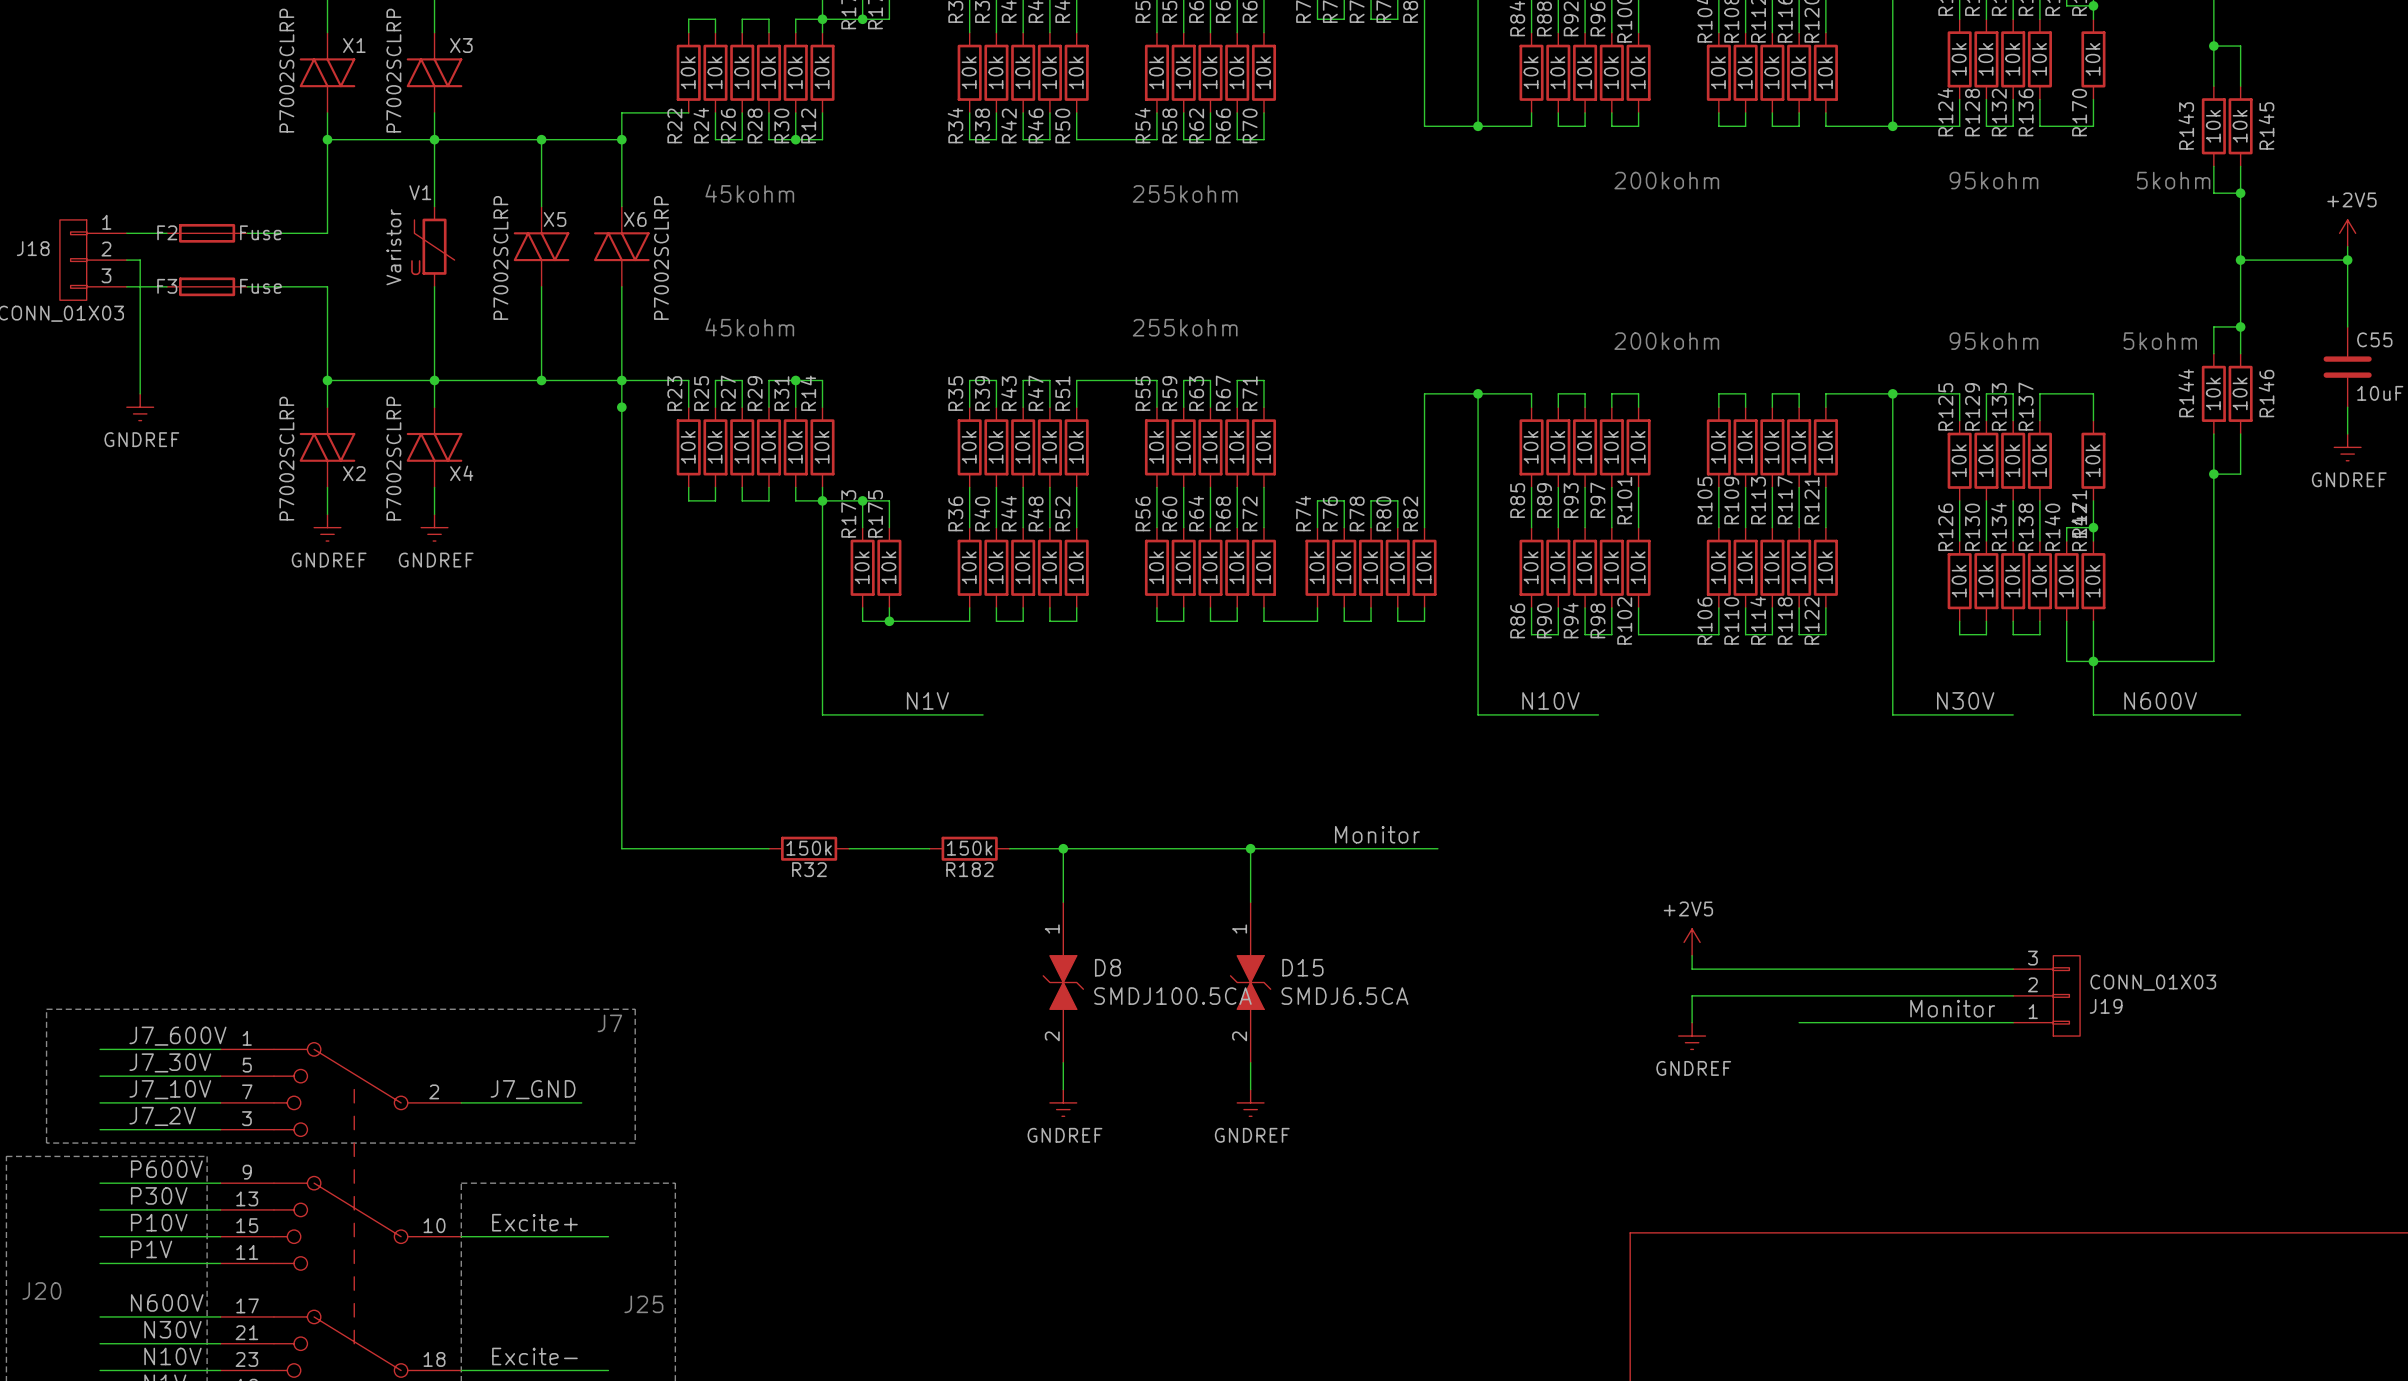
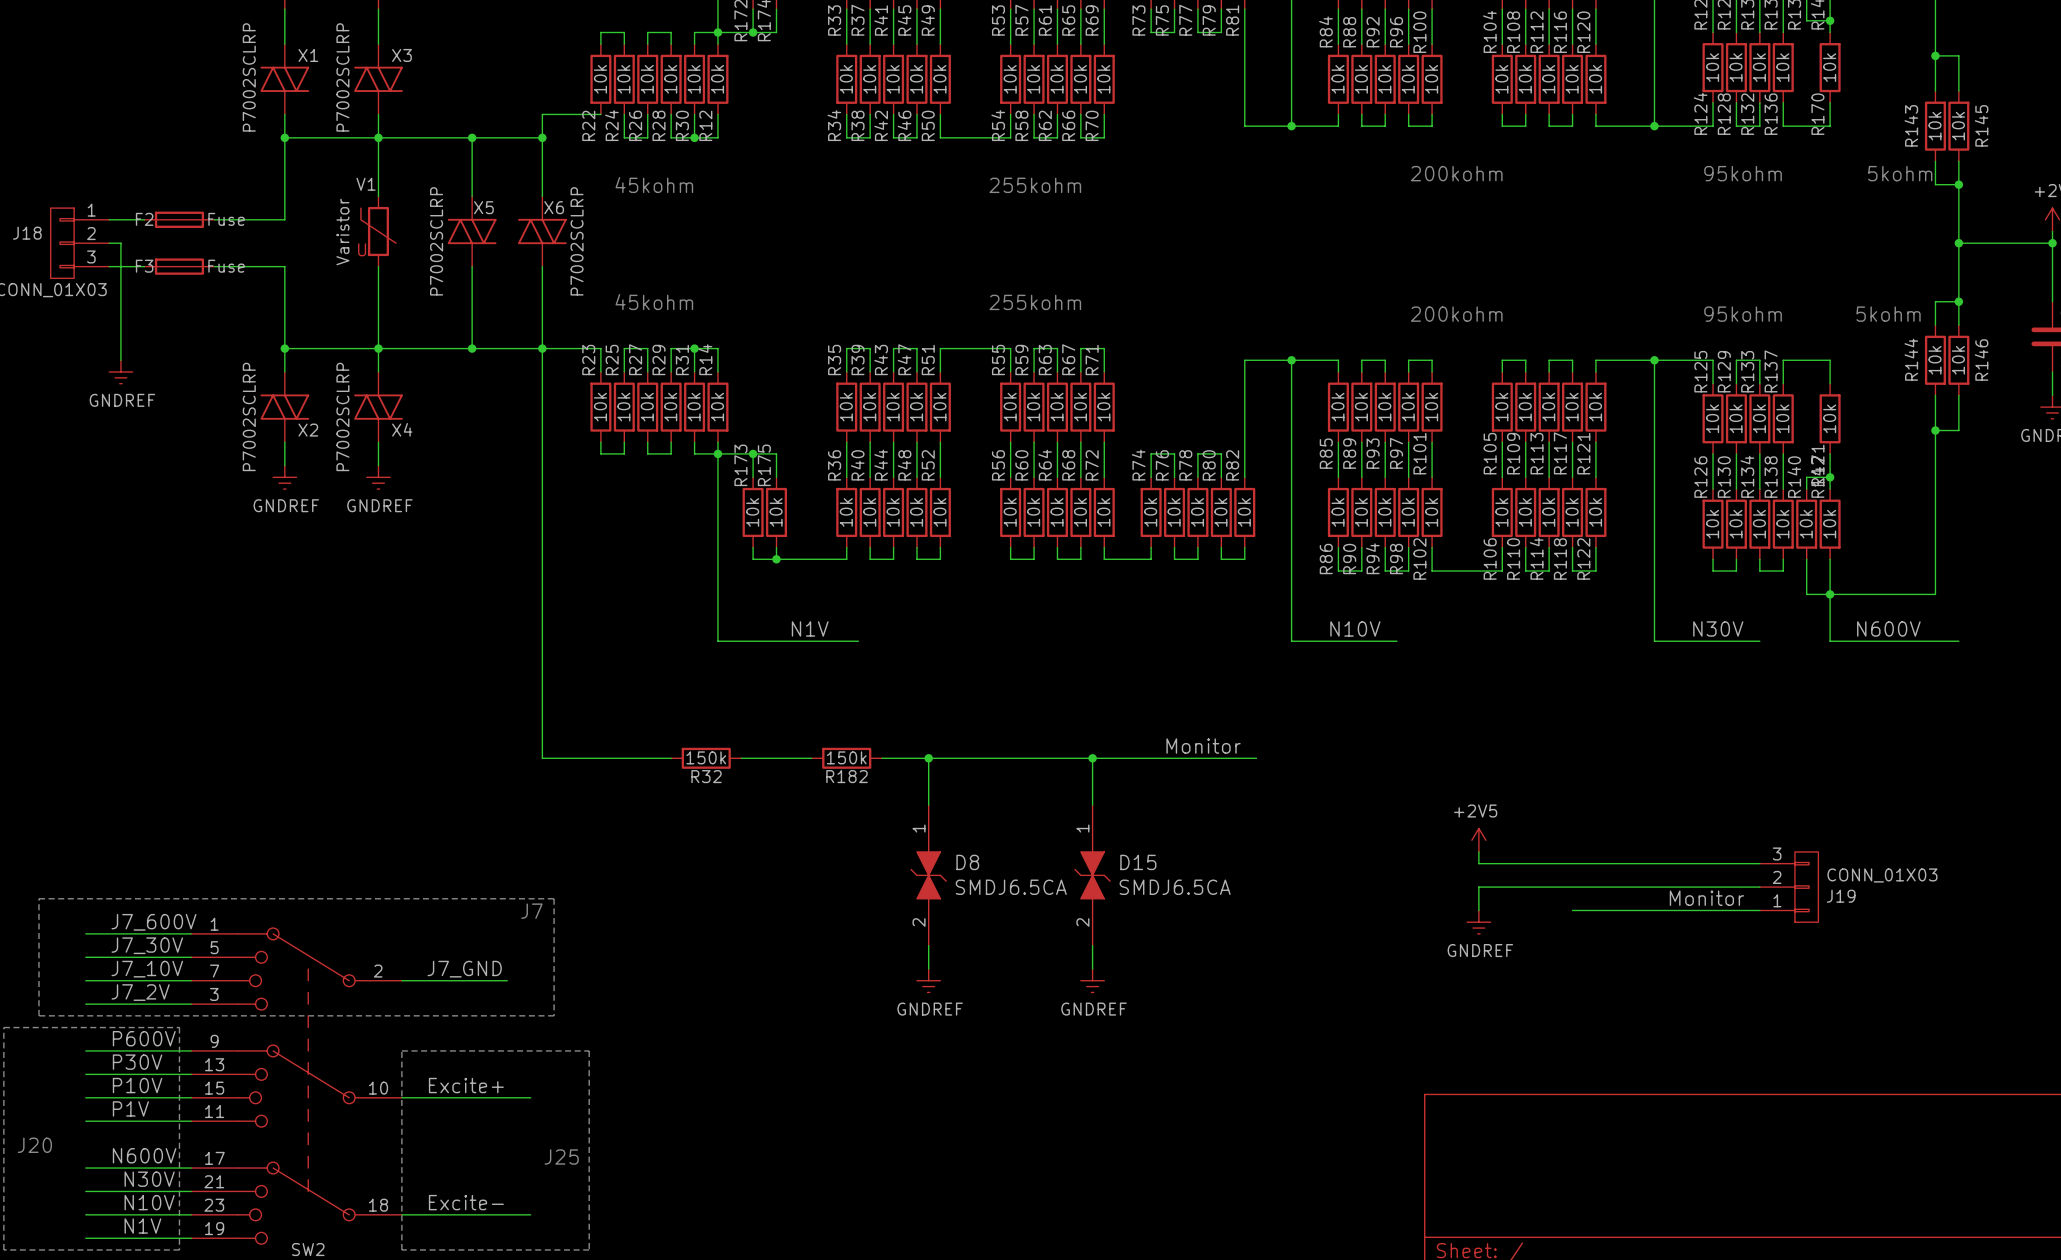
junction: (621, 407) -> none
D8 value: SMDJ100.5CA (1172, 996) -> SMDJ6.5CA (1011, 887)

